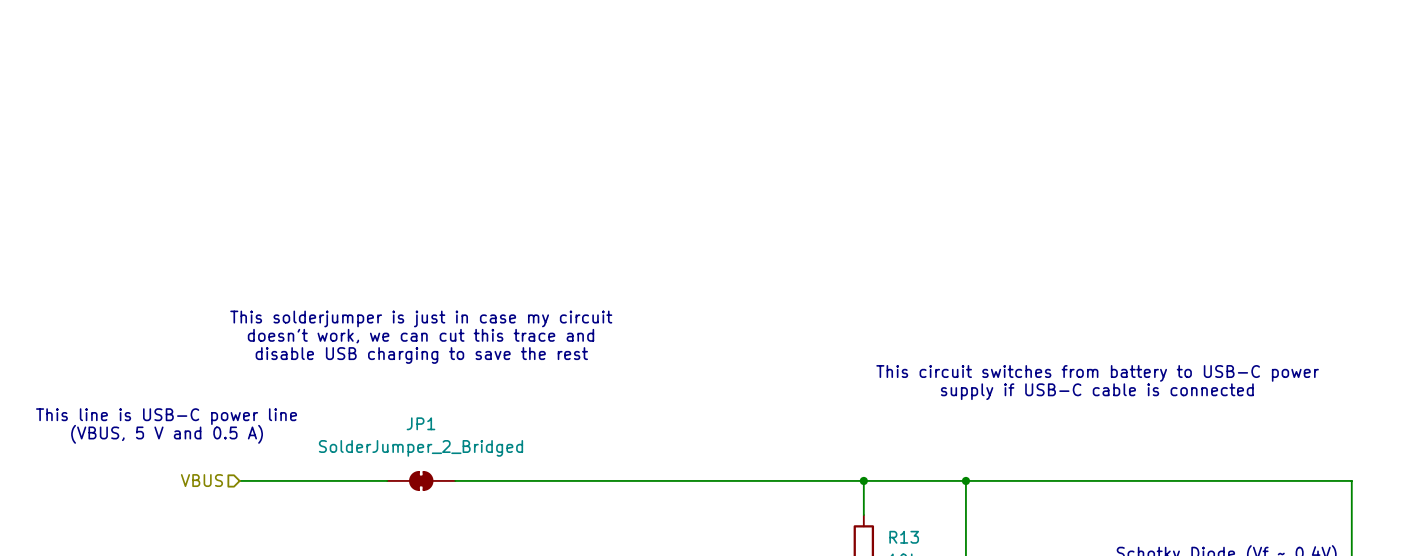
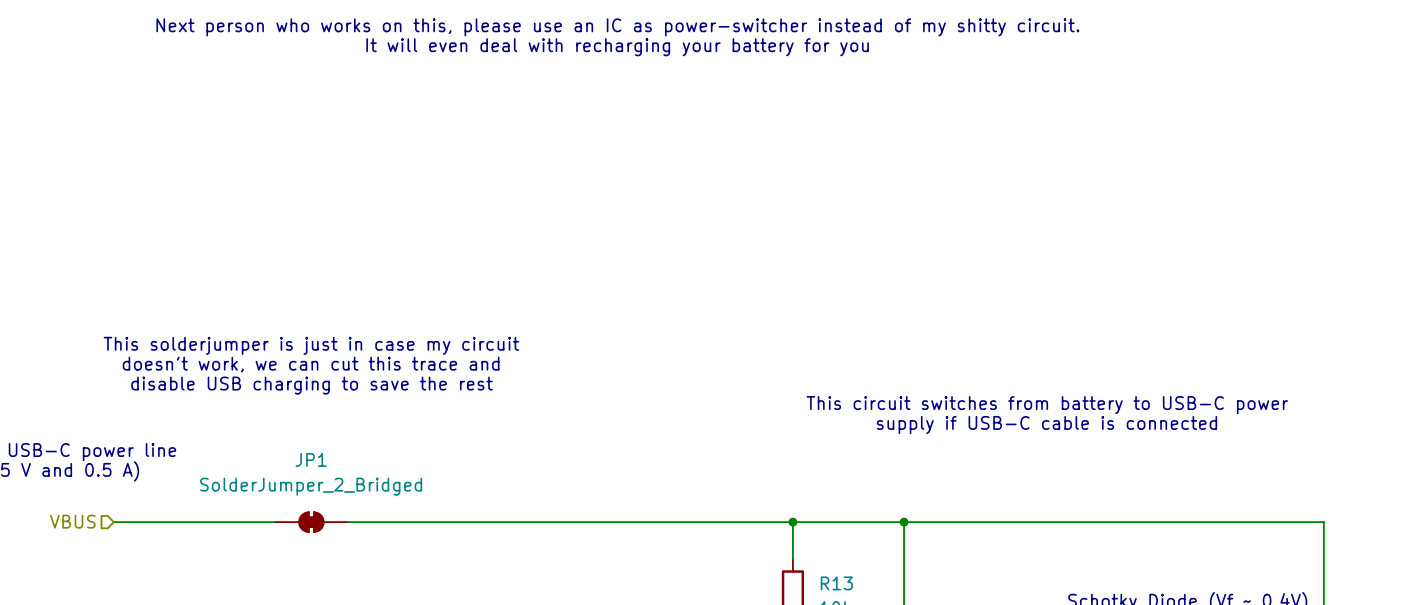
text: none -> Next person who works on this, please use an IC as power-switcher instead of my shitty circuit. (617, 27)
text: none -> It will even deal with recharging your battery for you (617, 47)

